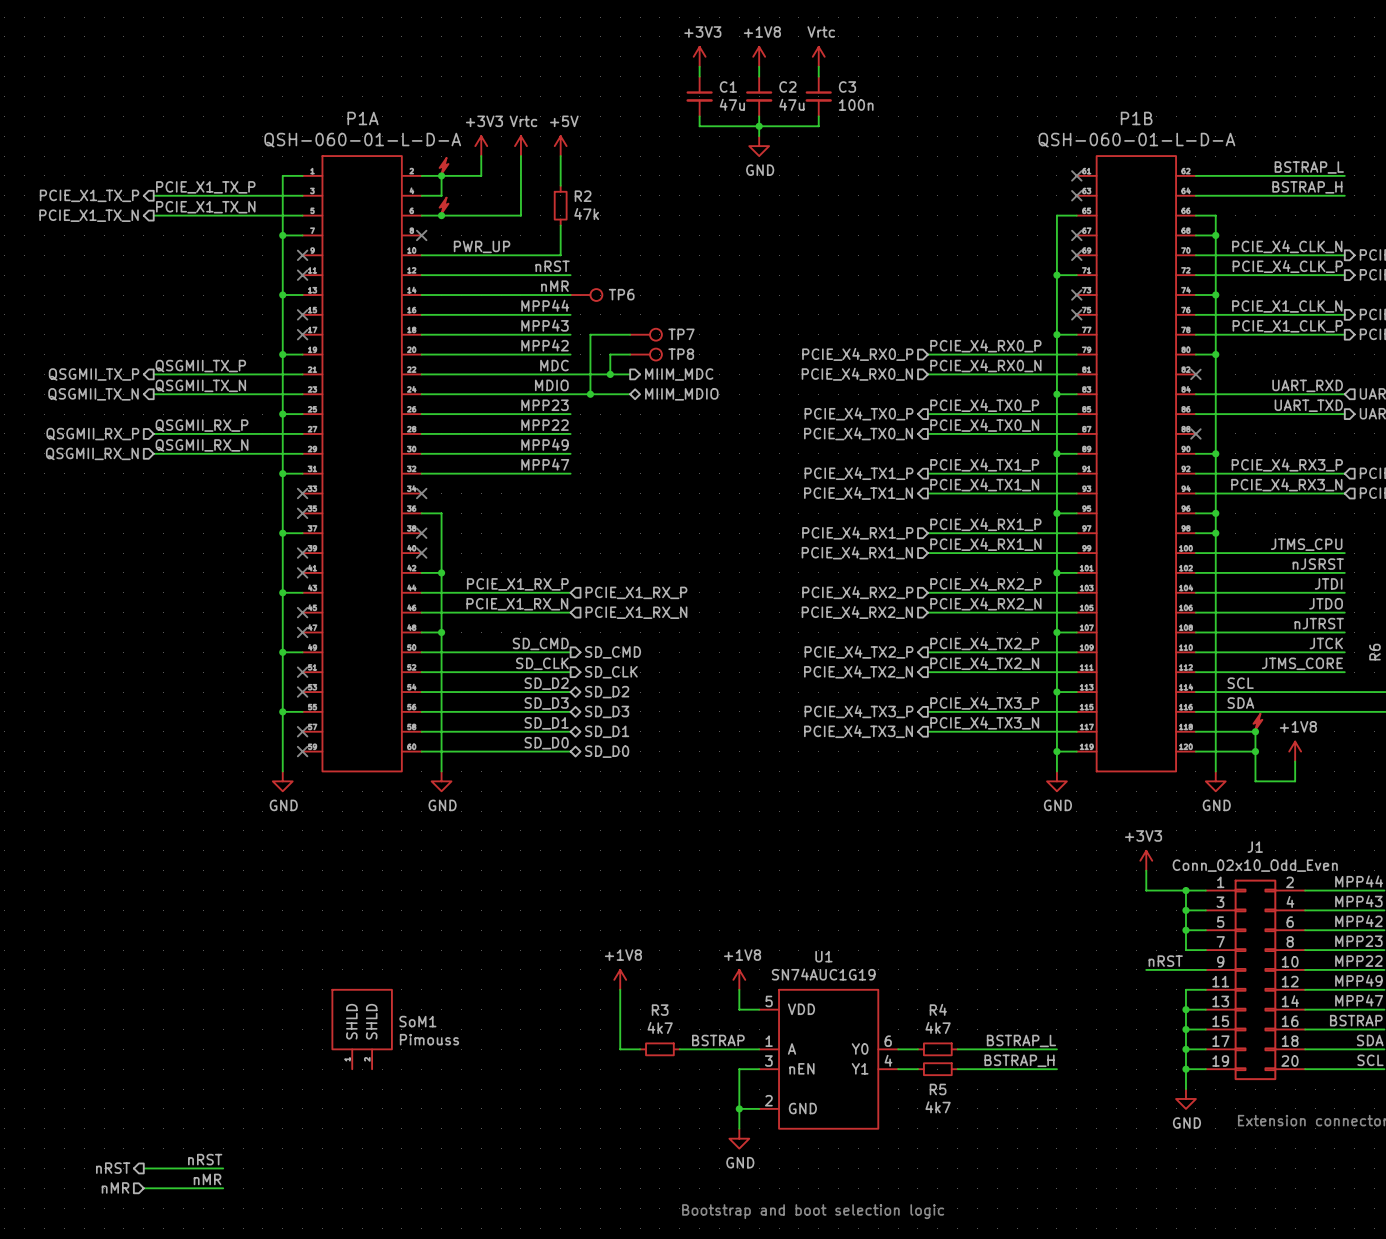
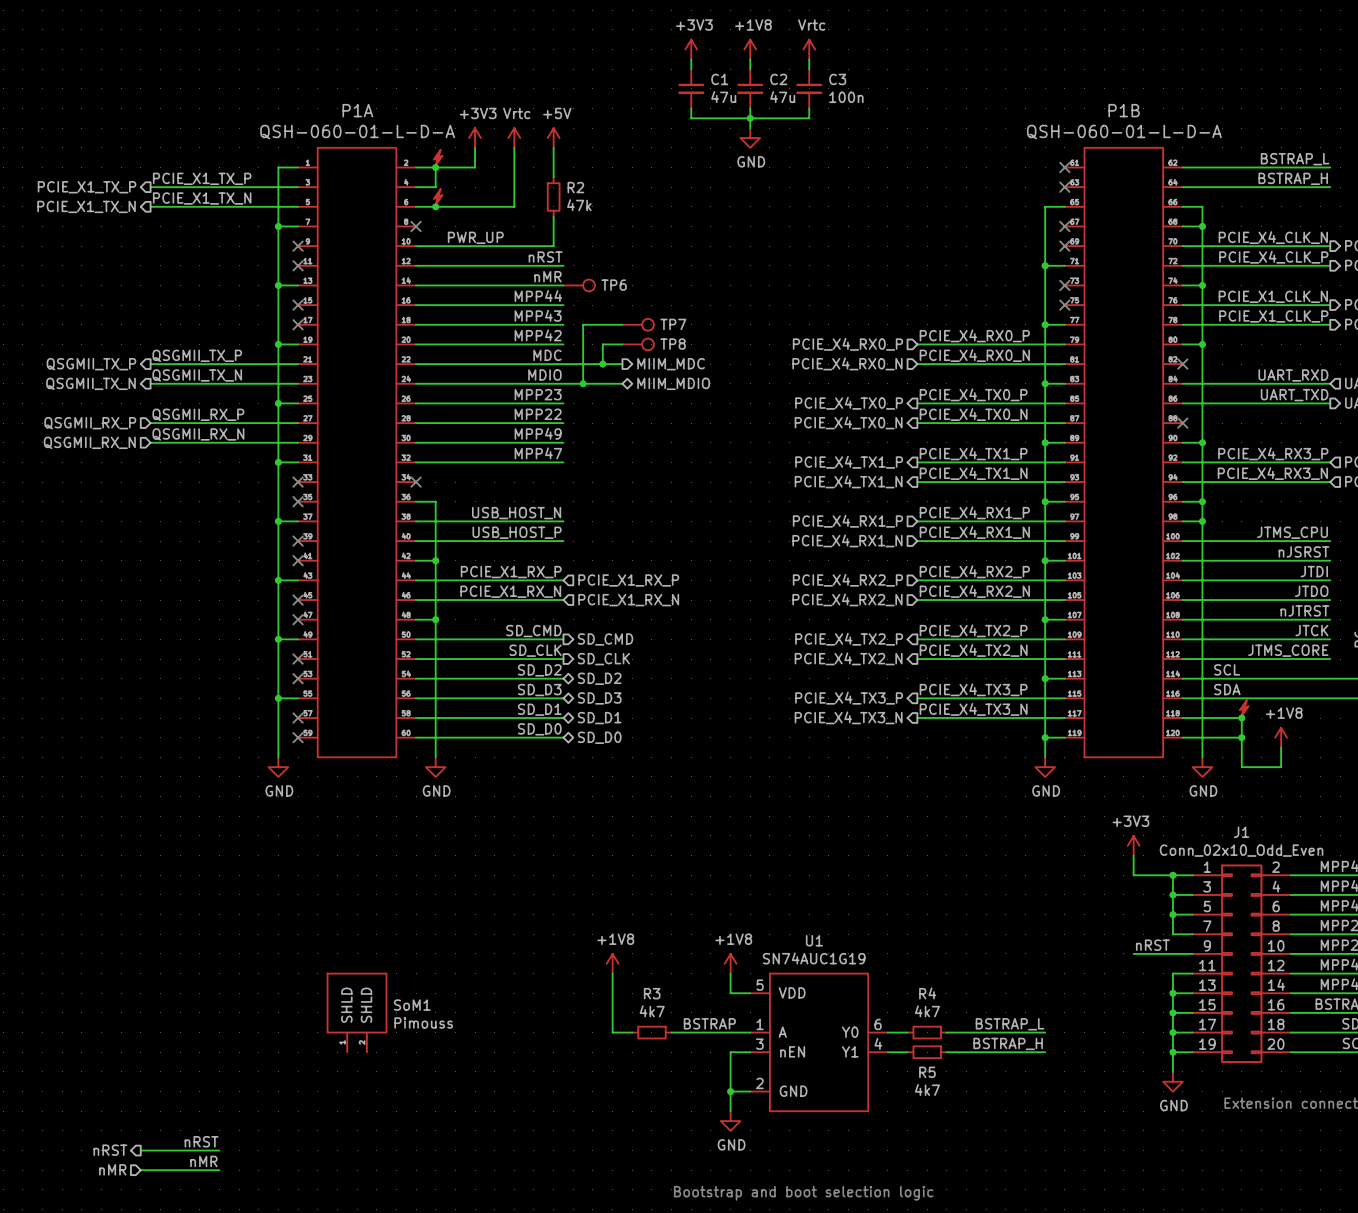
label: none -> USB_HOST_N (516, 513)
wire: none -> (416, 521) (563, 521)
no-connect mark: (421, 533) -> none
label: none -> USB_HOST_P (517, 532)
wire: none -> (416, 541) (563, 541)
no-connect mark: (421, 553) -> none

